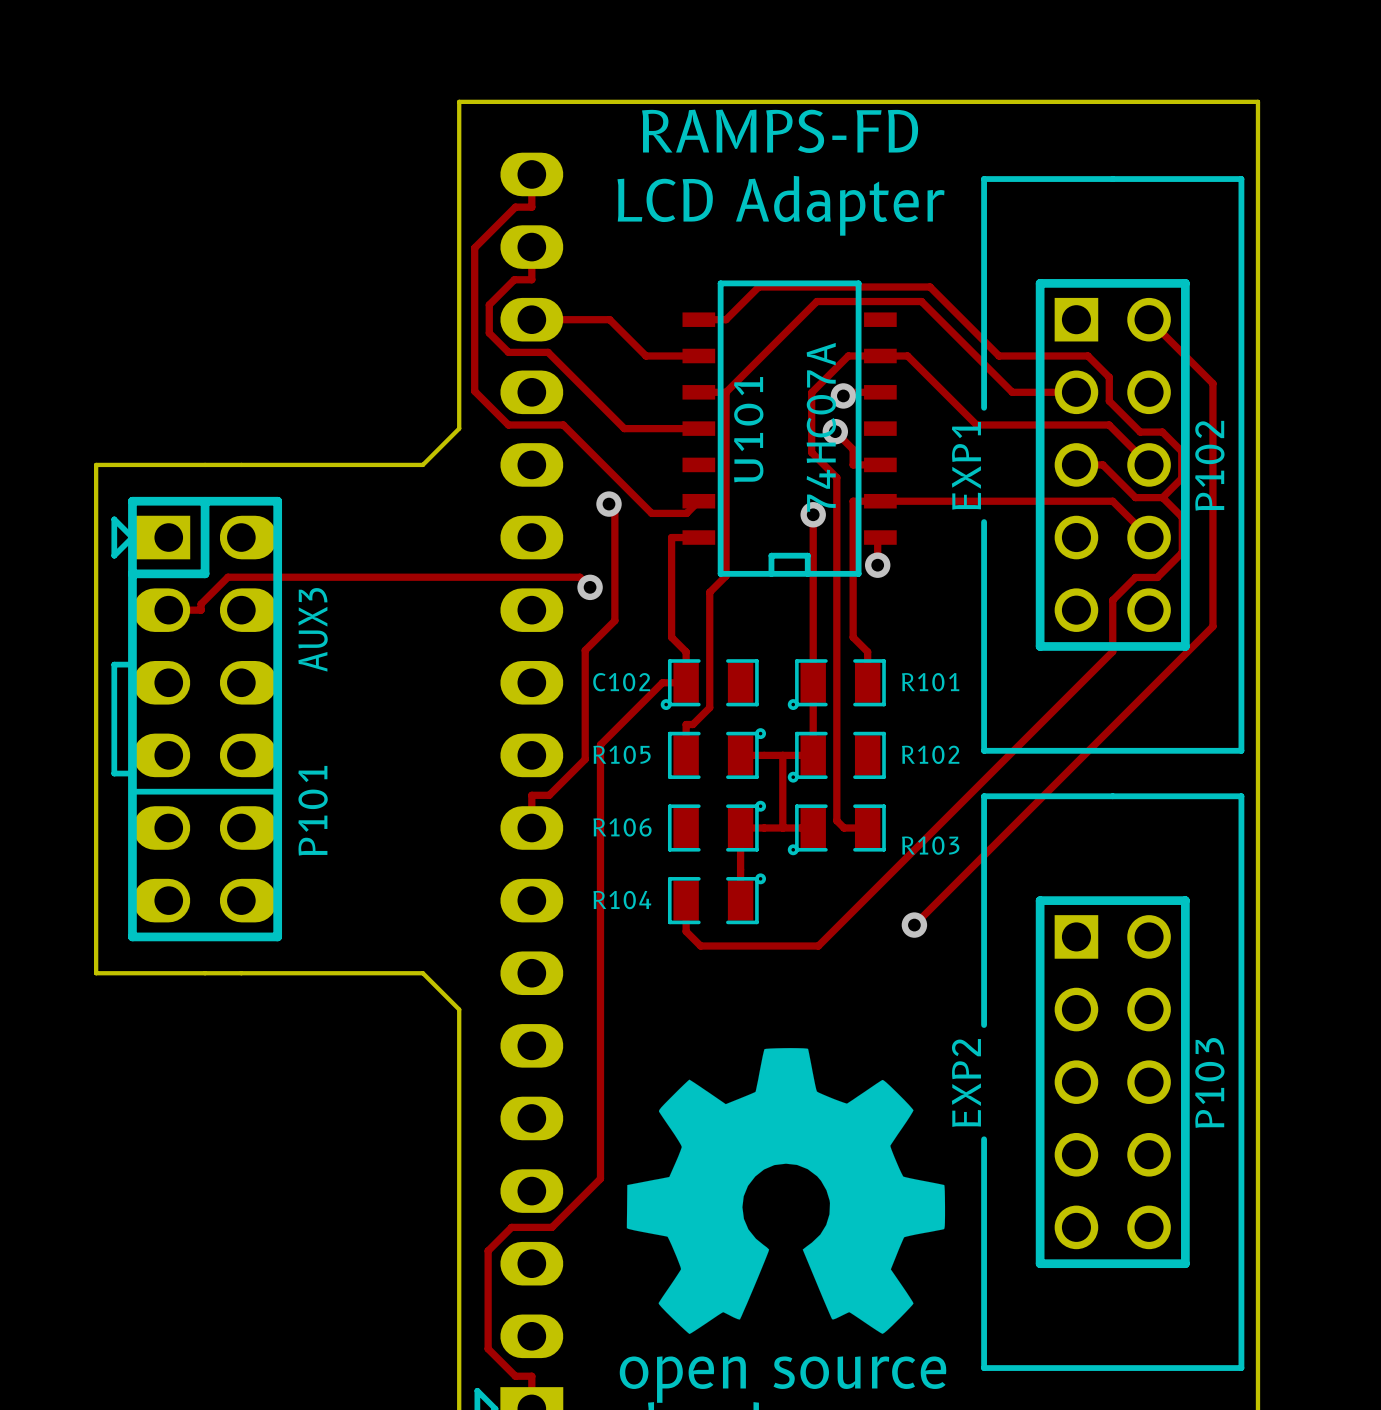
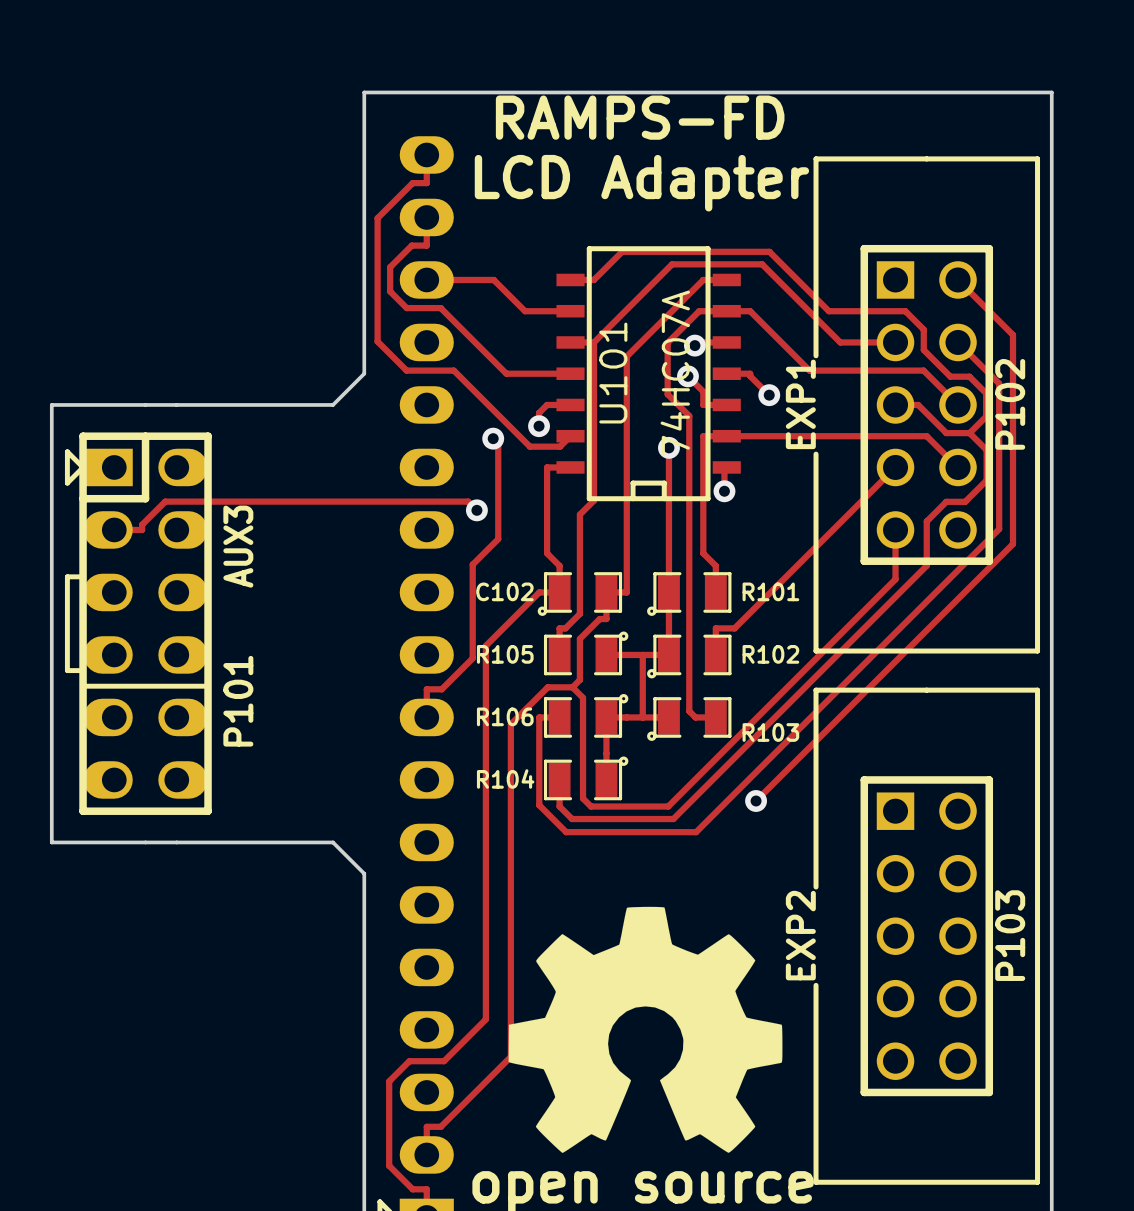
track: none -> (726, 279) (703, 279) (626, 356) (626, 592) (606, 592) (606, 619) (599, 619) (579, 638) (579, 679) (572, 687)
track: none -> (958, 342) (999, 383) (999, 529) (696, 832) (566, 832) (539, 805) (539, 717) (559, 717)
track: none -> (726, 373) (750, 373) (750, 376) (769, 395)
via: none -> (769, 395)
track: none -> (570, 404) (547, 404) (539, 413) (539, 426)
via: none -> (539, 426)
track: none -> (895, 467) (734, 628) (715, 628) (715, 654)
track: none -> (895, 529) (895, 579) (668, 806) (591, 806) (583, 798) (583, 697) (572, 687)
track: none -> (572, 687) (547, 687) (510, 724) (510, 1056) (440, 1126) (426, 1126) (426, 1154)

